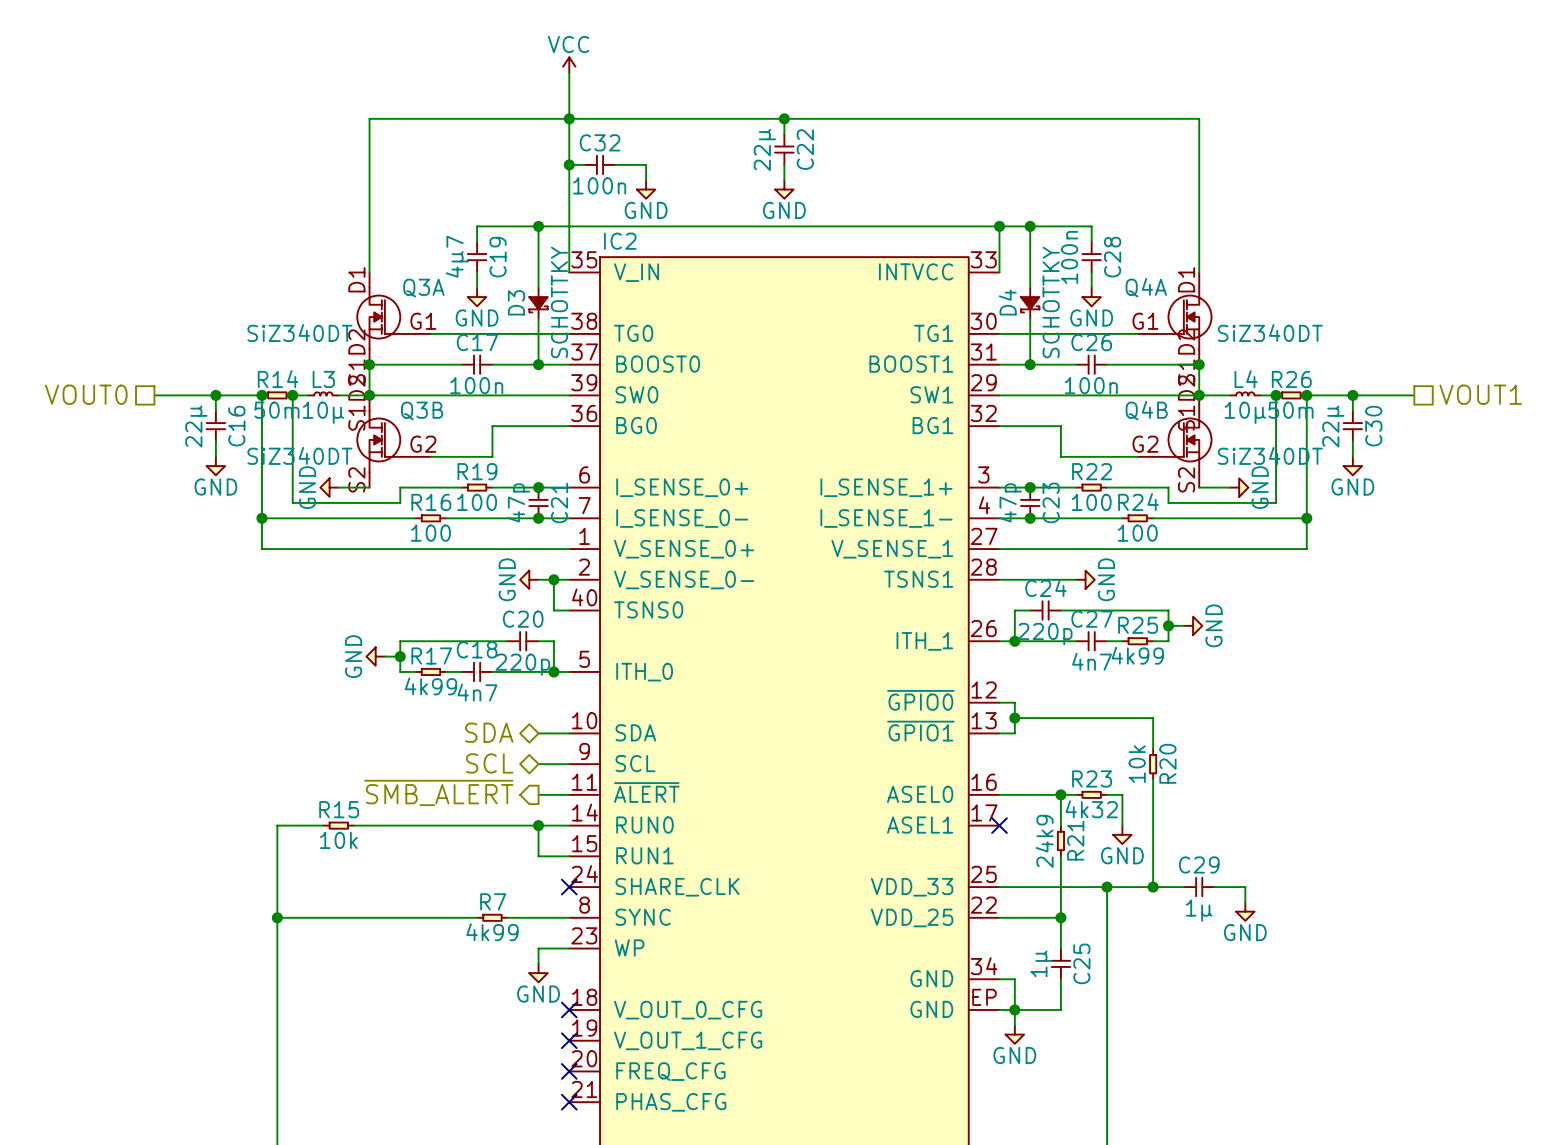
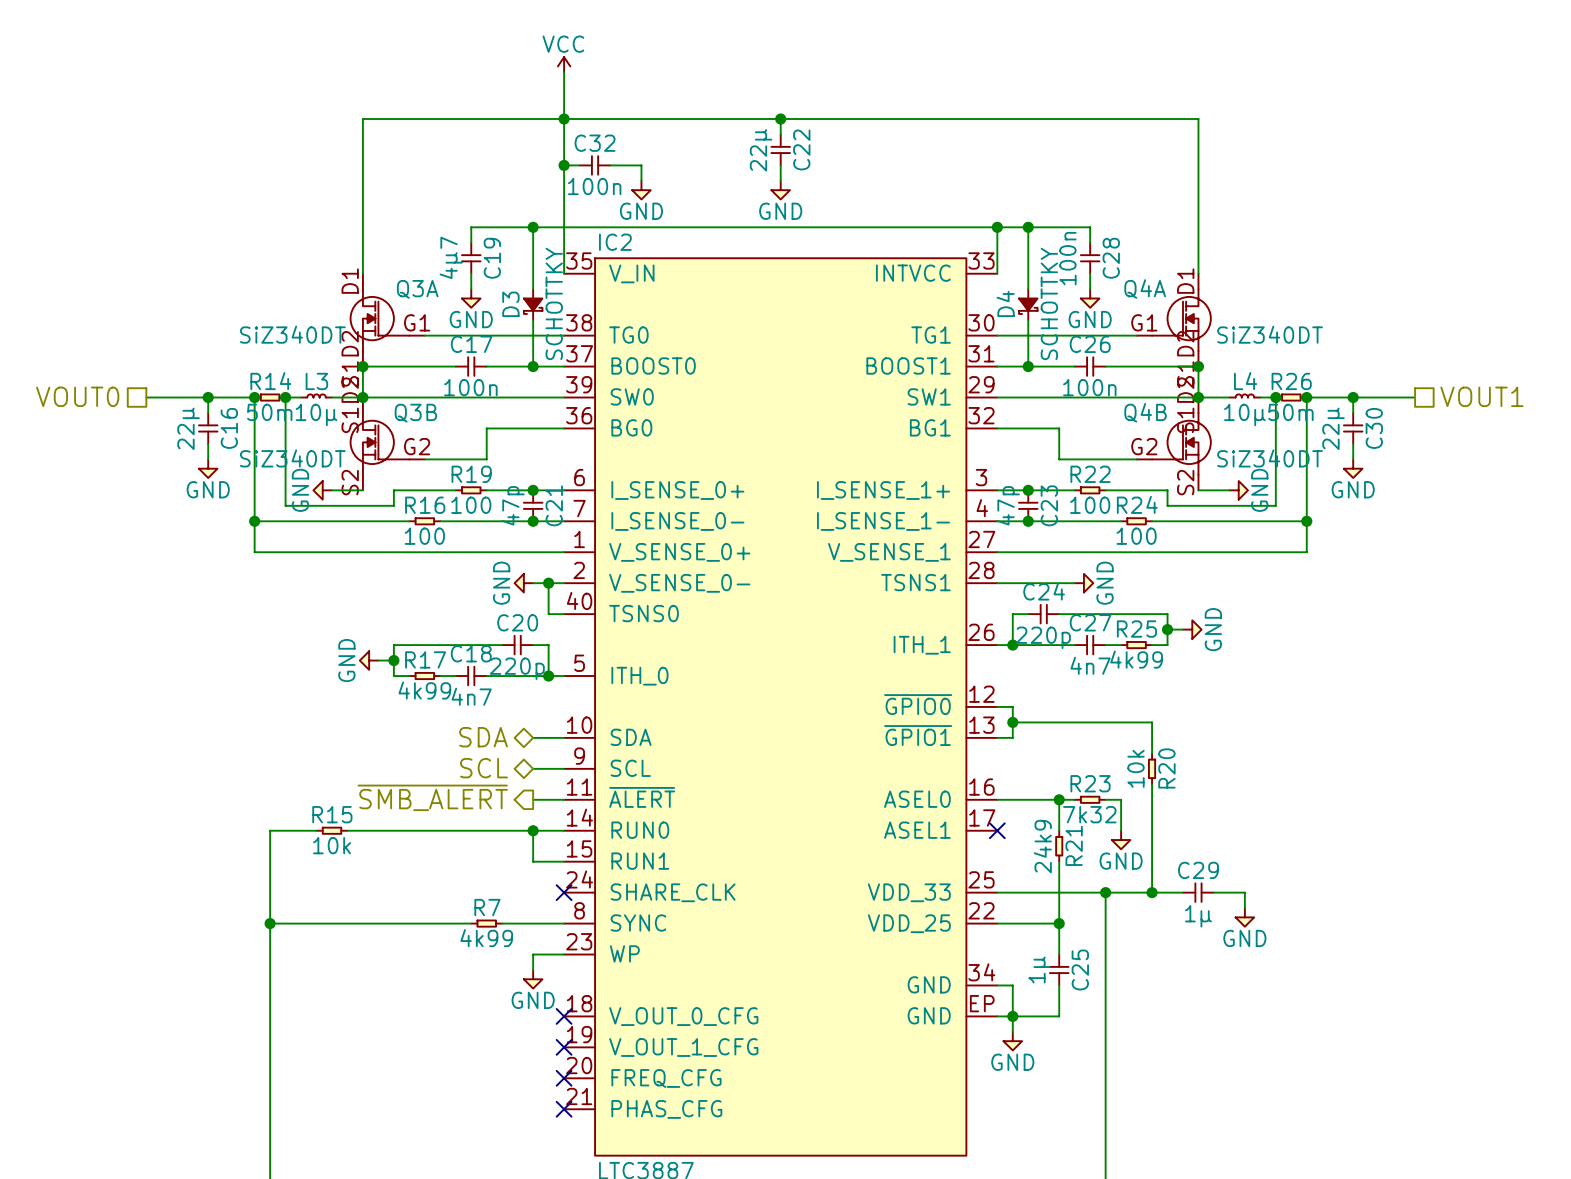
R23 value: 4k32 (1091, 809) -> 7k32 (1089, 814)

